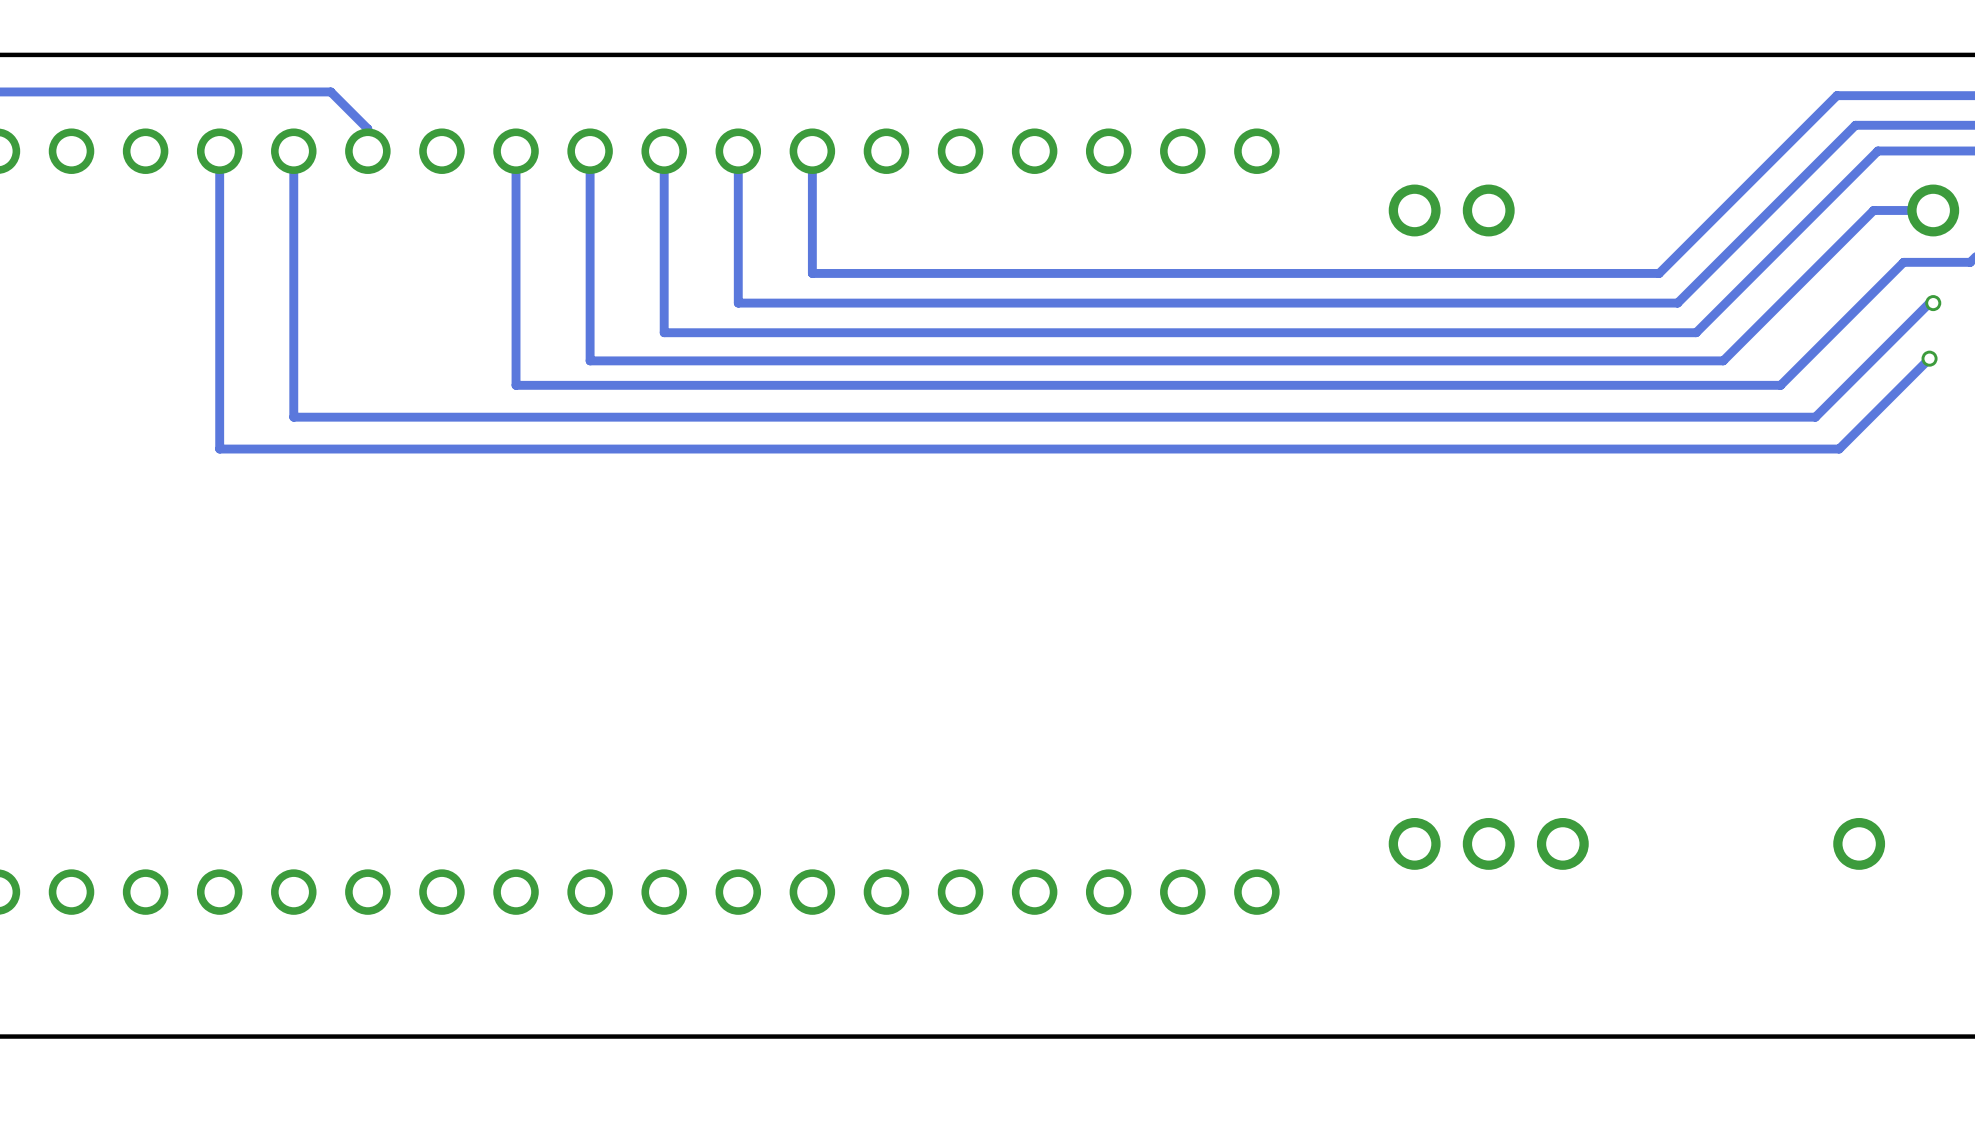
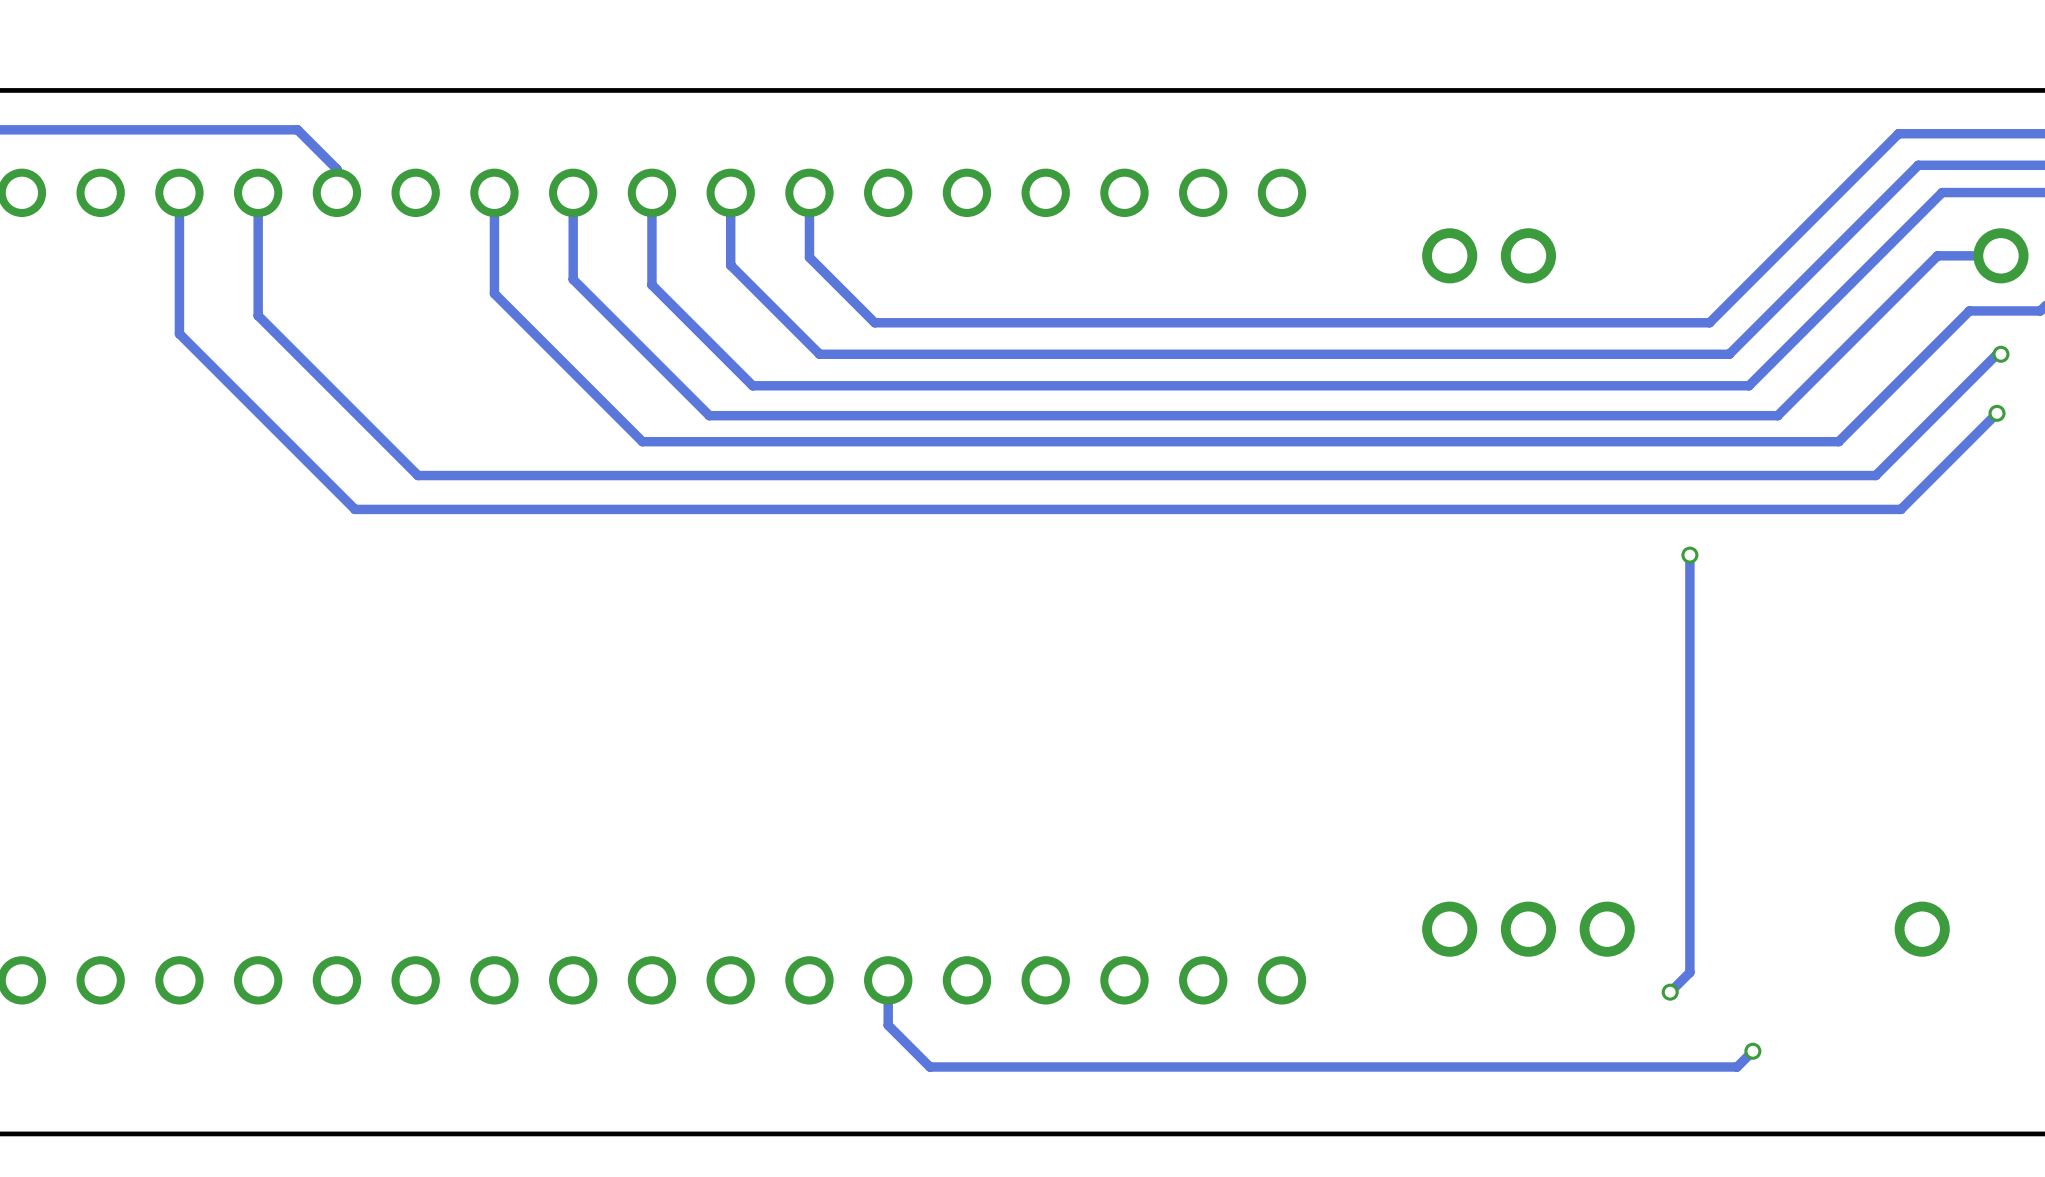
track: (812, 212) (812, 273) (873, 273) -> (809, 257) (874, 322)
track: (738, 219) (738, 303) (821, 303) -> (730, 265) (819, 354)
track: (590, 232) (590, 360) (718, 360) -> (573, 279) (709, 415)
track: (664, 237) (664, 332) (758, 332) -> (651, 285) (752, 385)
track: (516, 246) (516, 385) (655, 385) -> (494, 293) (642, 441)
track: (293, 266) (293, 417) (444, 417) -> (258, 315) (418, 475)
track: (219, 283) (219, 449) (384, 449) -> (179, 333) (355, 509)
track: none -> (1689, 555) (1689, 972) (1670, 992)
via: none -> (1689, 555)
track: none -> (888, 980) (888, 1025) (929, 1066) (1737, 1066) (1752, 1051)
via: none -> (1670, 992)
via: none -> (1752, 1051)

